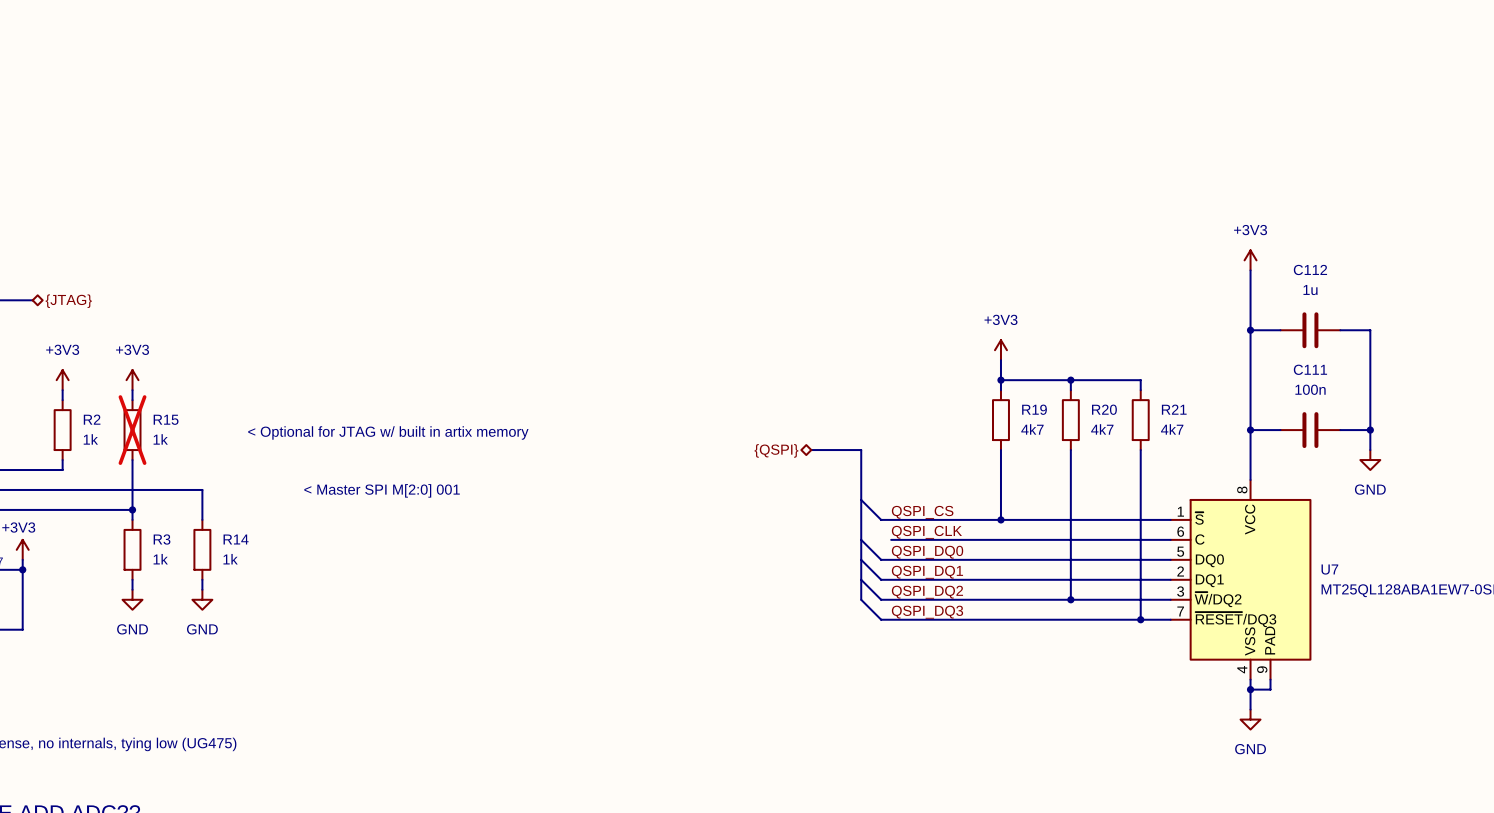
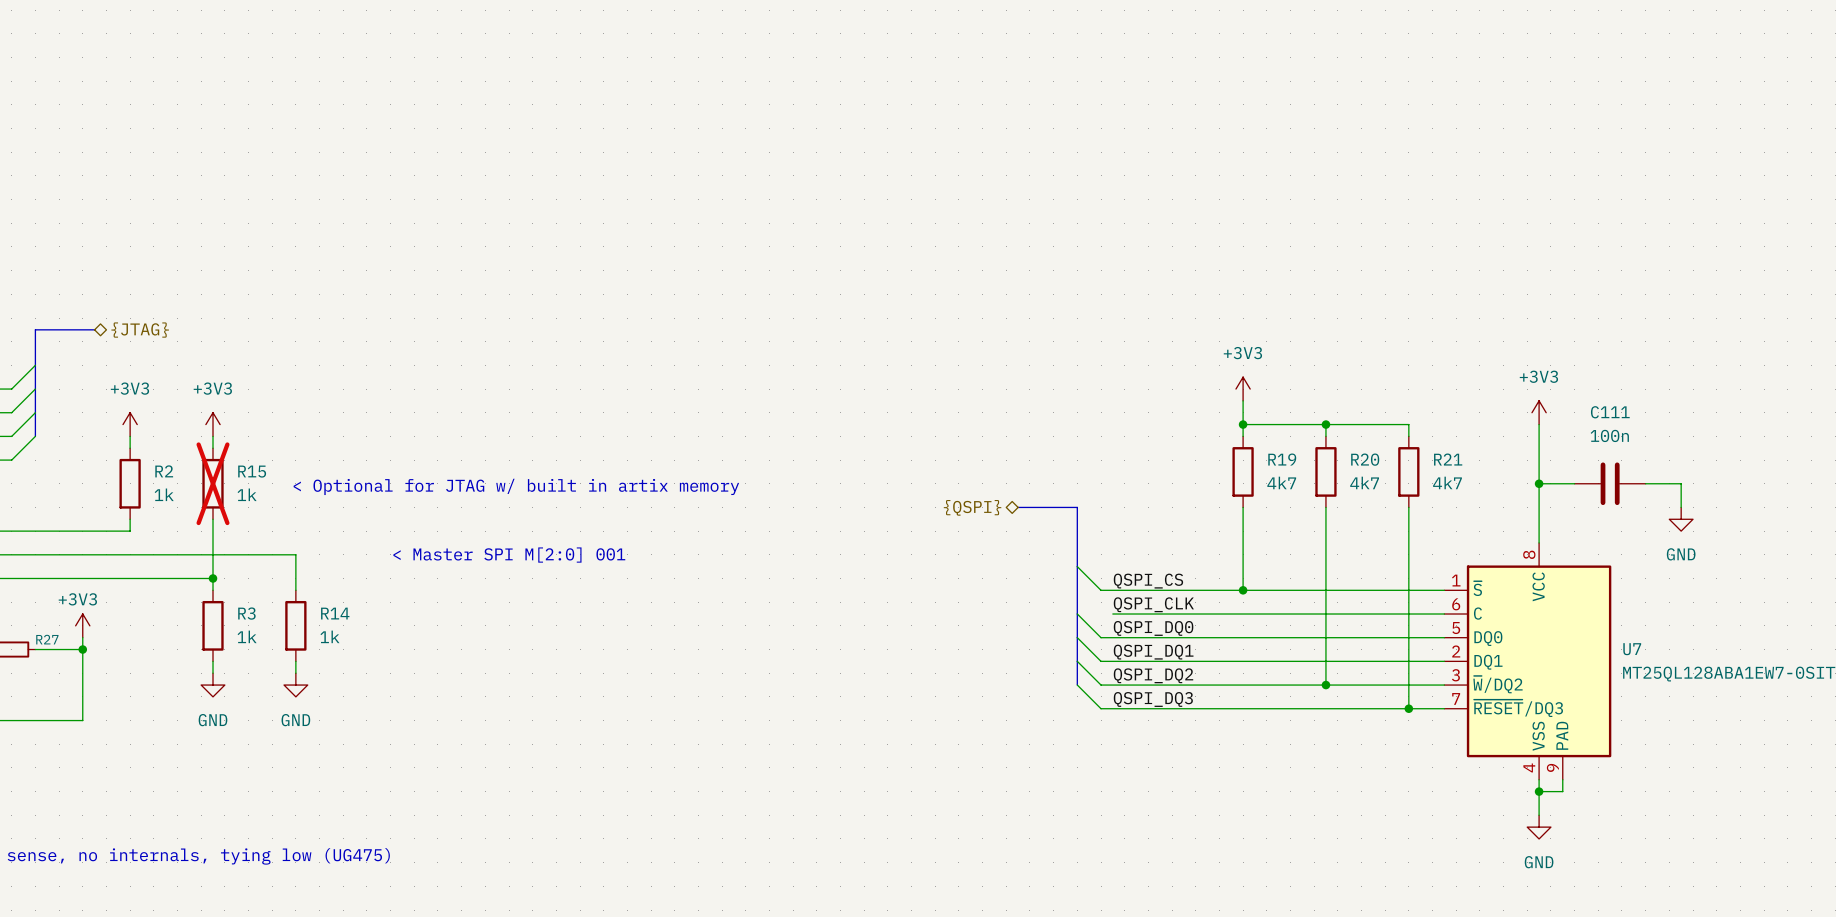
power symbol position: +3V3 (1250, 260) -> +3V3 (1539, 412)
wire: (1250, 270) (1250, 380) -> none
wire: (1250, 330) (1280, 330) -> none
junction: (1250, 330) -> none
C112: 1u (1310, 330) -> none
wire: (1340, 330) (1370, 330) (1370, 430) -> none
junction: (1370, 430) -> none

